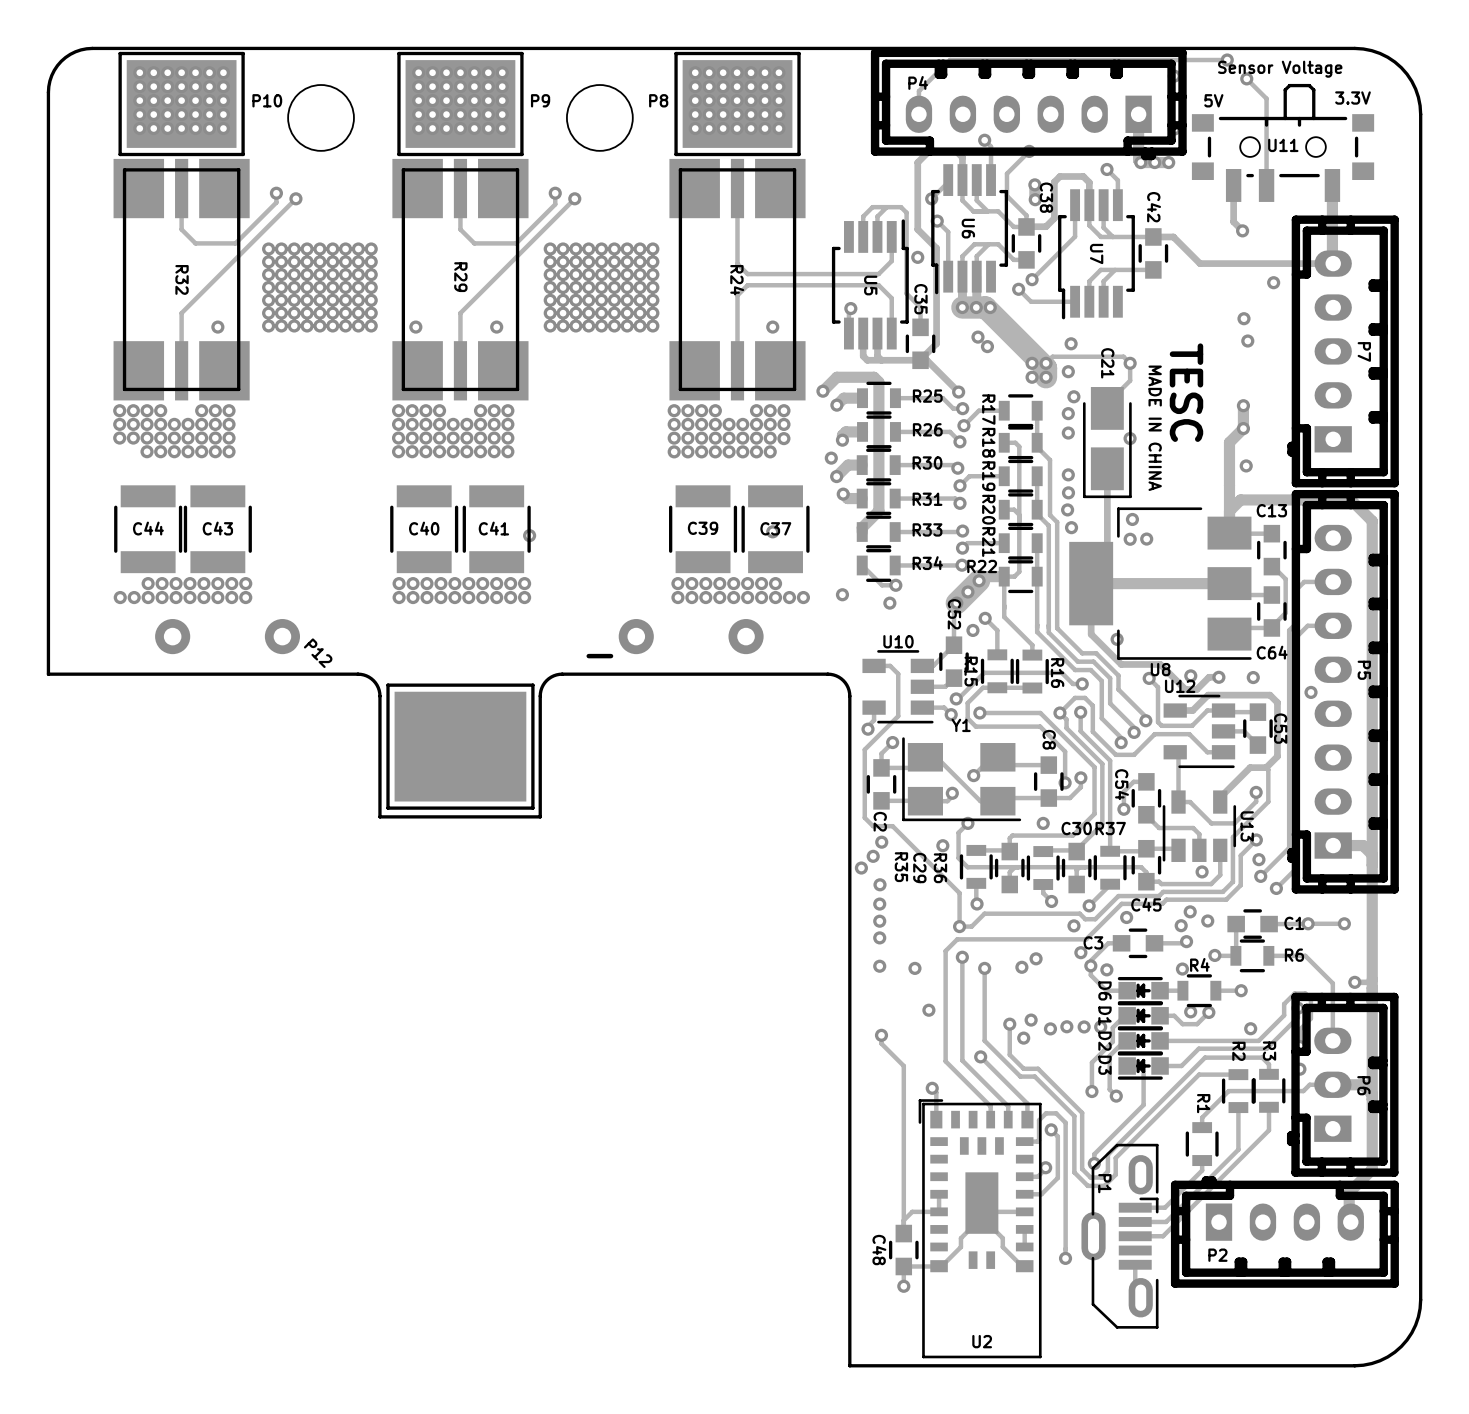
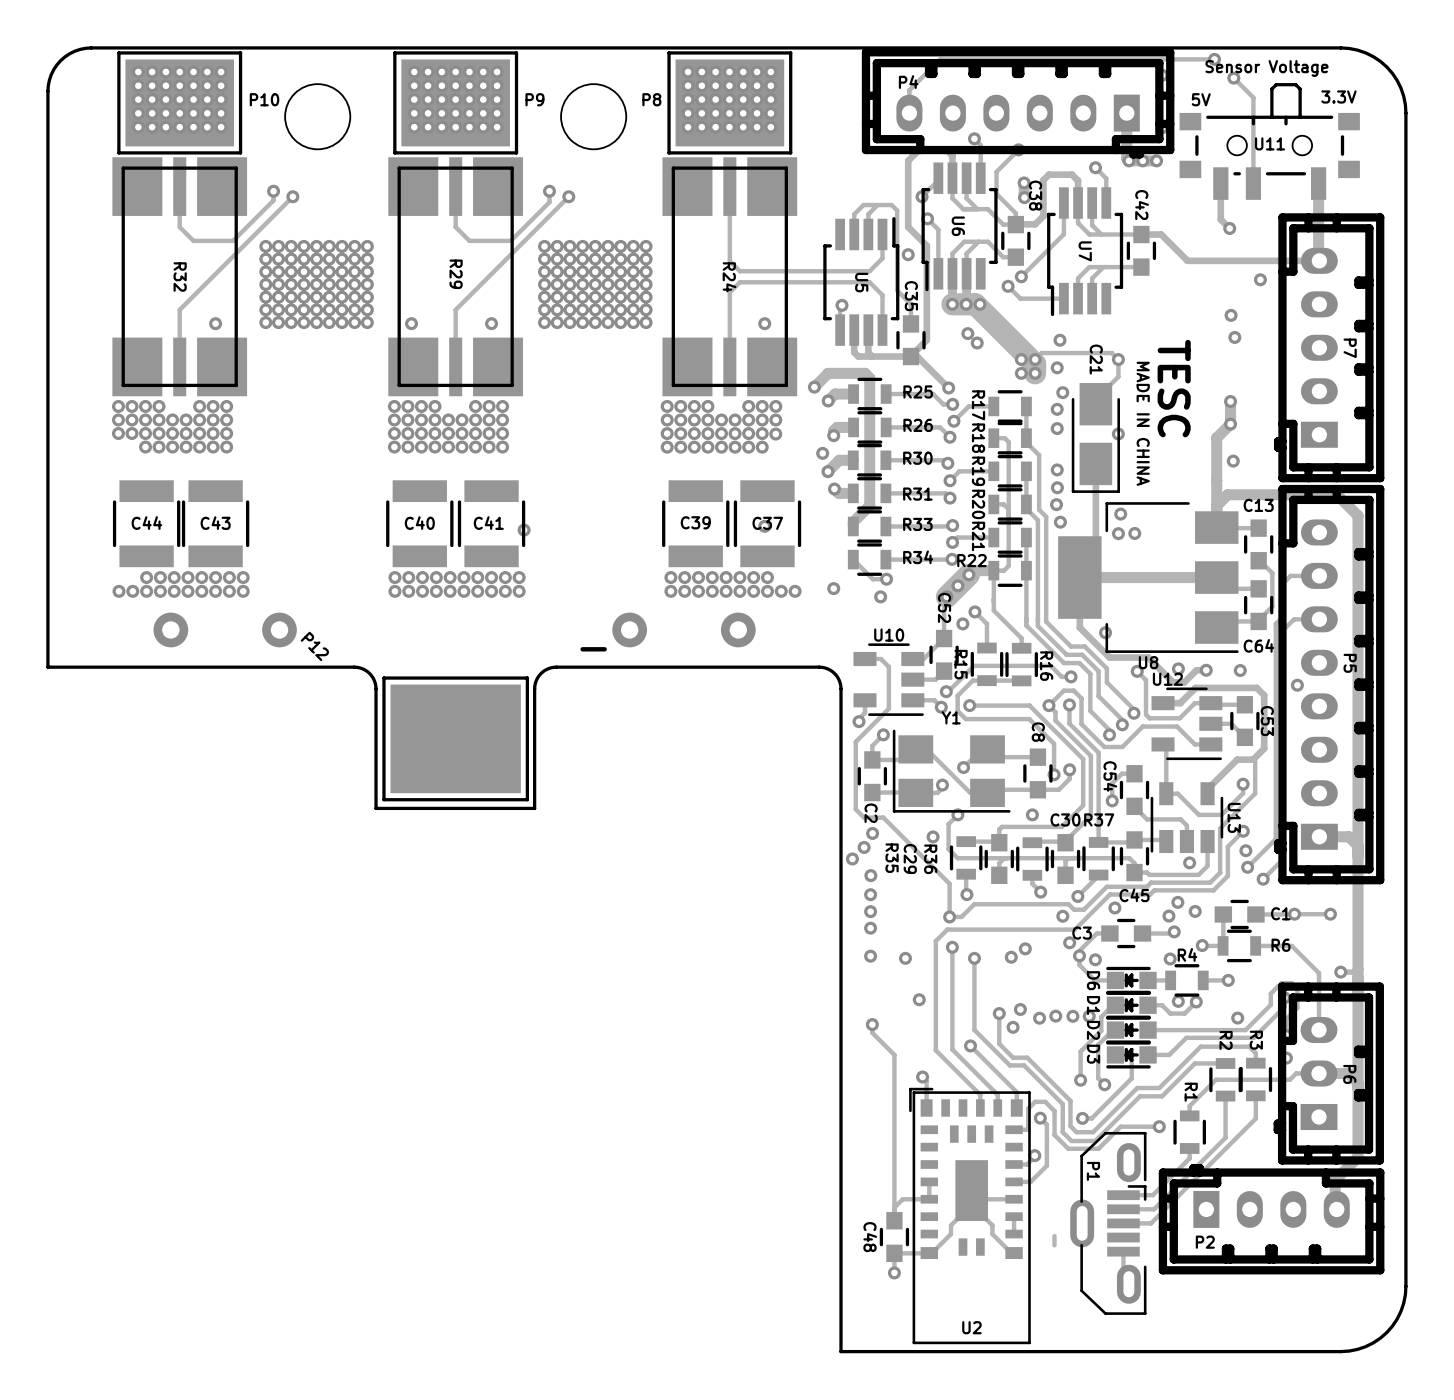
track: (1213, 1057) (1205, 1057) (1107, 1154) (1107, 1171) (1101, 1177) (1090, 1177) (1082, 1169) (1081, 1112) -> (1200, 1046) (1159, 1088) (1137, 1088) (1093, 1132) (1076, 1132) (1070, 1126) (1070, 1100)
track: (1207, 1074) (1199, 1074) (1115, 1158) (1115, 1174) (1104, 1185) (1087, 1185) (1074, 1172) (1073, 1115) -> (1194, 1063) (1162, 1096) (1140, 1096) (1095, 1141) (1071, 1141) (1062, 1132) (1062, 1104)
track: (1143, 1089) (1143, 1104) (1094, 1154) (1094, 1163) -> (1131, 1078) (1091, 1118) (1082, 1118)
via: none -> (1159, 1126)
track: (1065, 1146) (1065, 1248) -> (1054, 1135) (1068, 1148) (1098, 1148) (1120, 1126) (1159, 1126)
via position: (1094, 1163) -> (1082, 1118)
via: (1065, 1258) -> none

